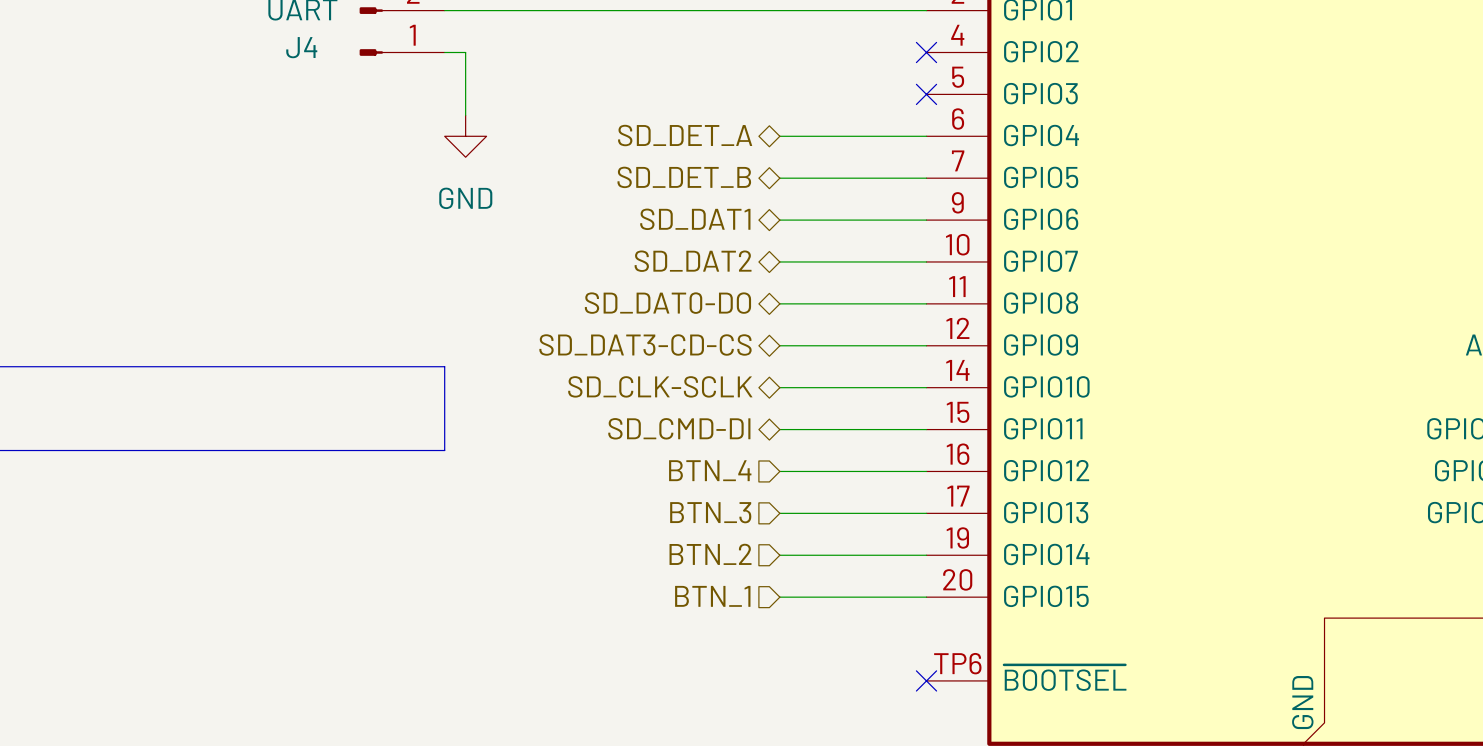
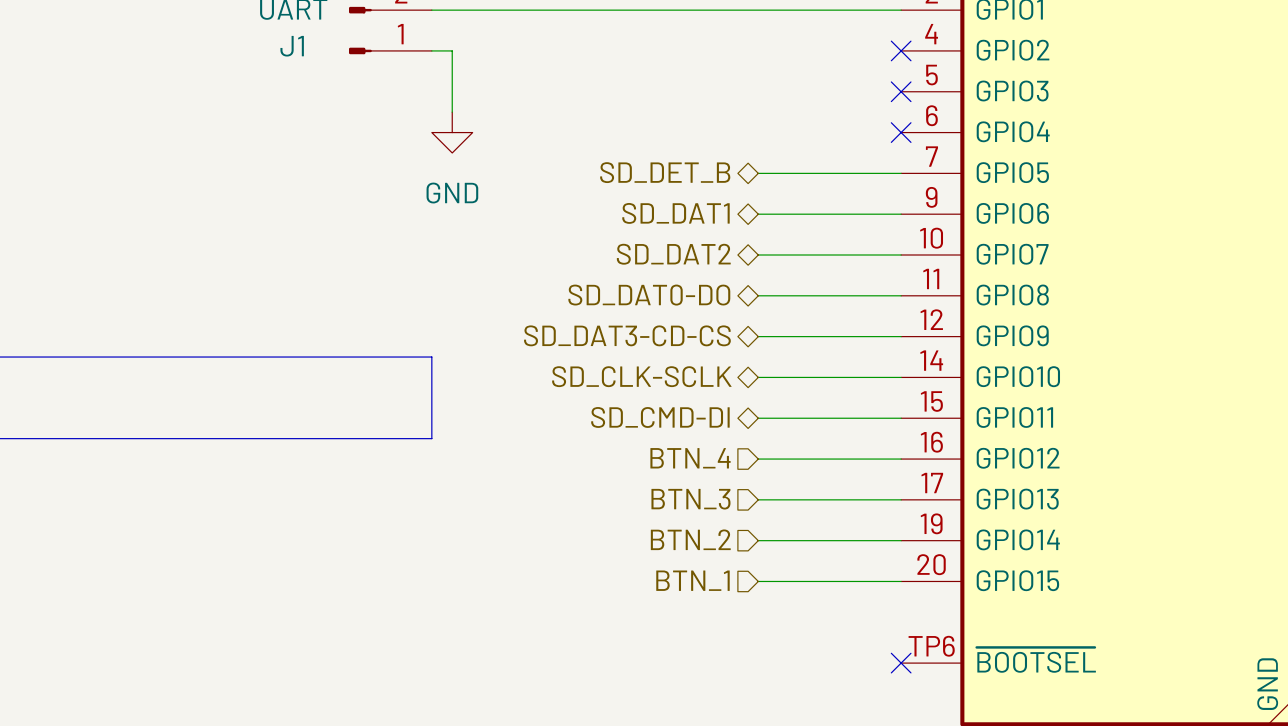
J4 name: J4 (301, 47) -> J1 (292, 46)
hierarchical label: SD_DET_A (685, 135) -> none
wire: (779, 136) (926, 136) -> none
no-connect mark: none -> (901, 132)

